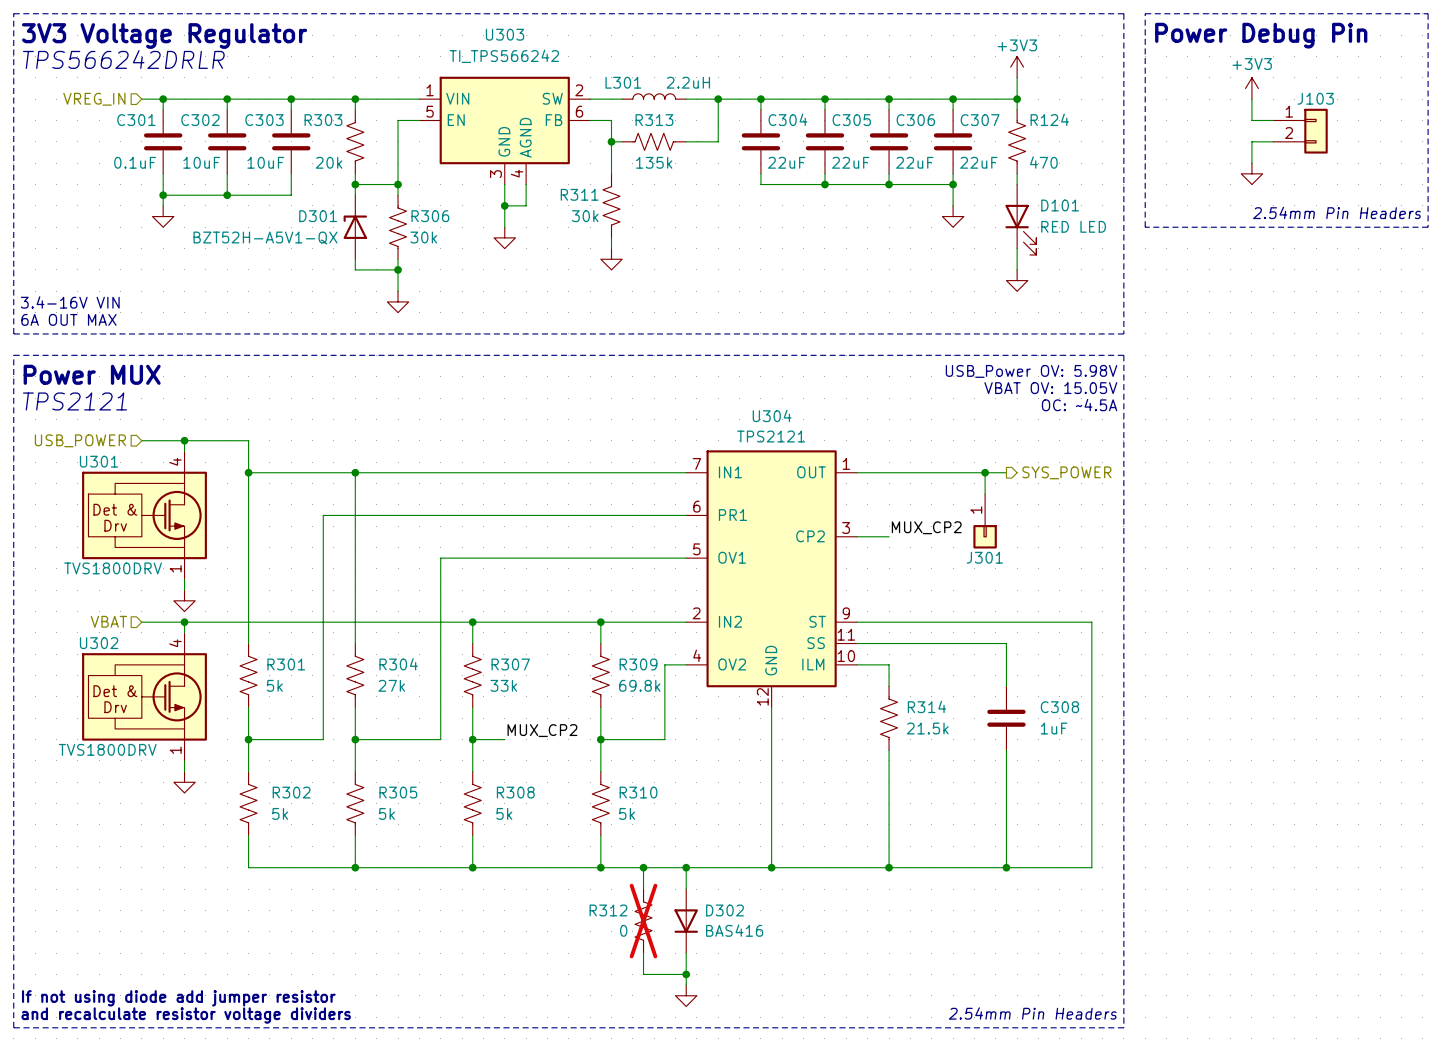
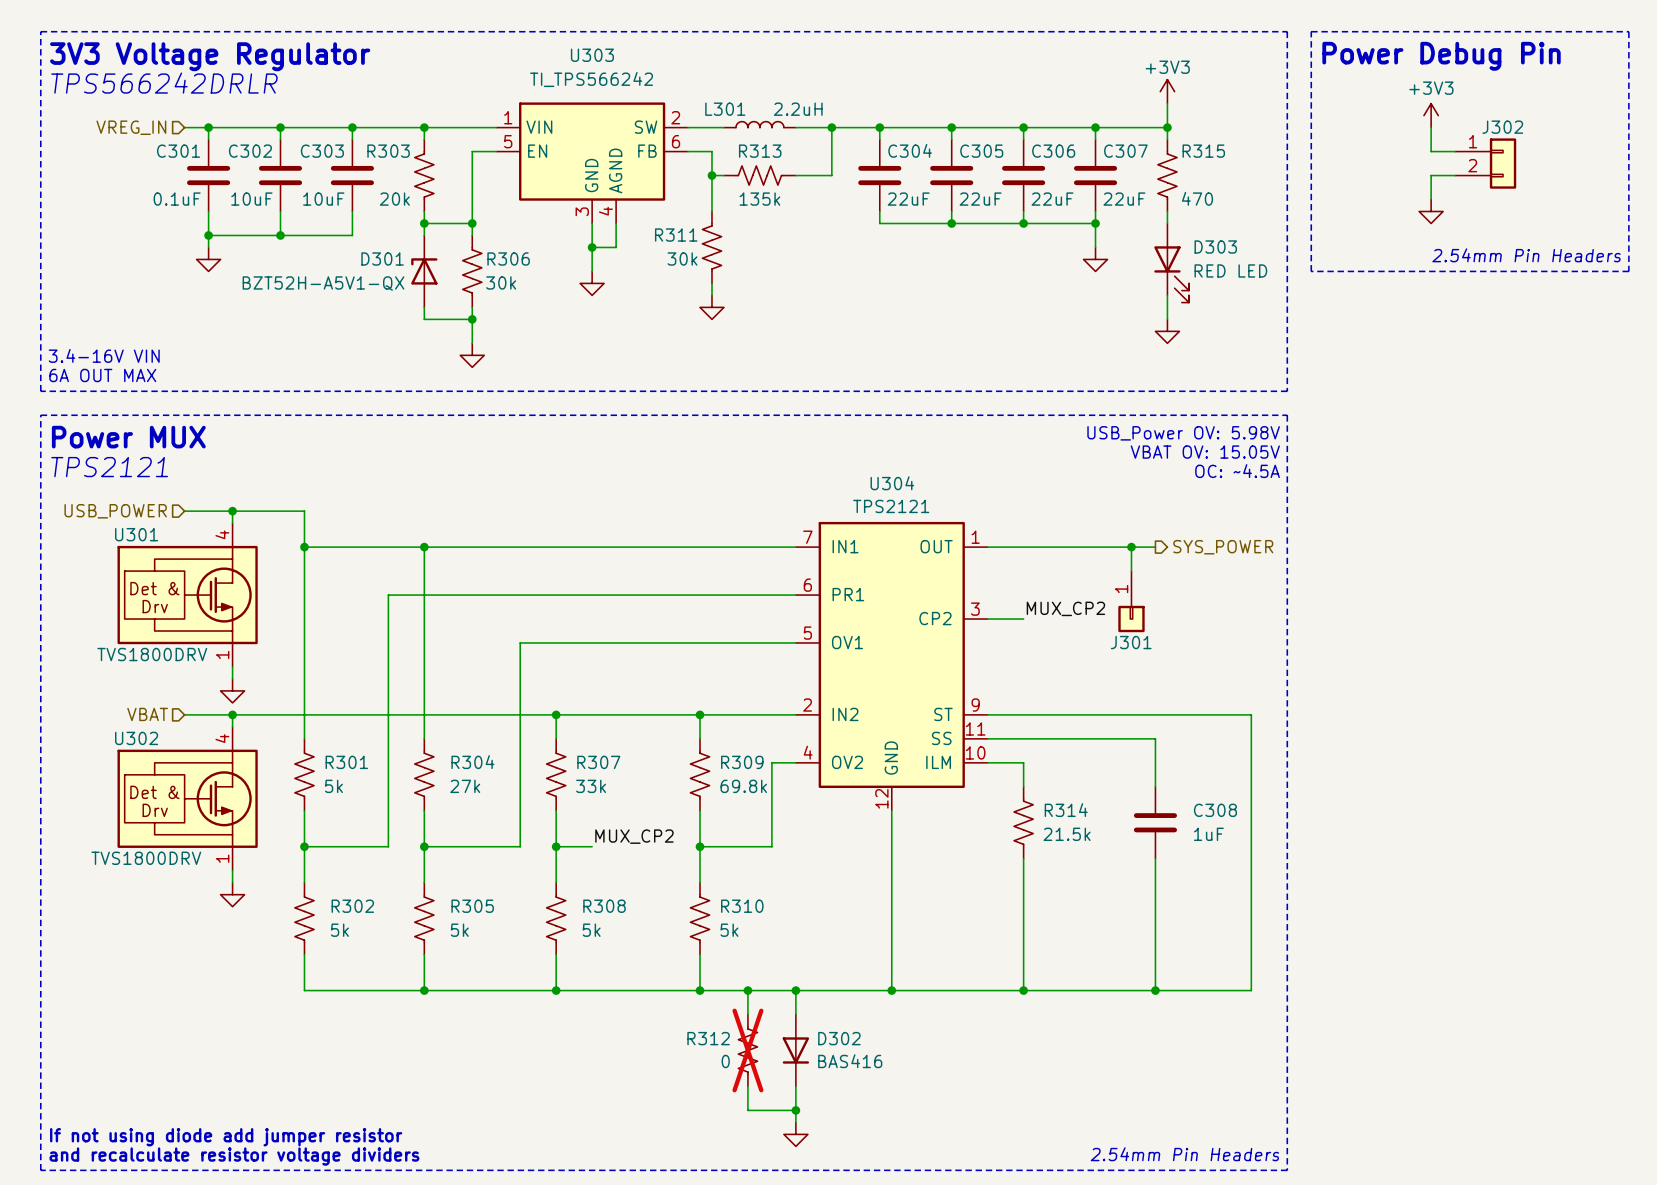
J103 name: J103 (1315, 98) -> J302 (1502, 127)
R124 name: R124 (1049, 119) -> R315 (1203, 151)
D101 name: D101 (1060, 205) -> D303 (1215, 247)

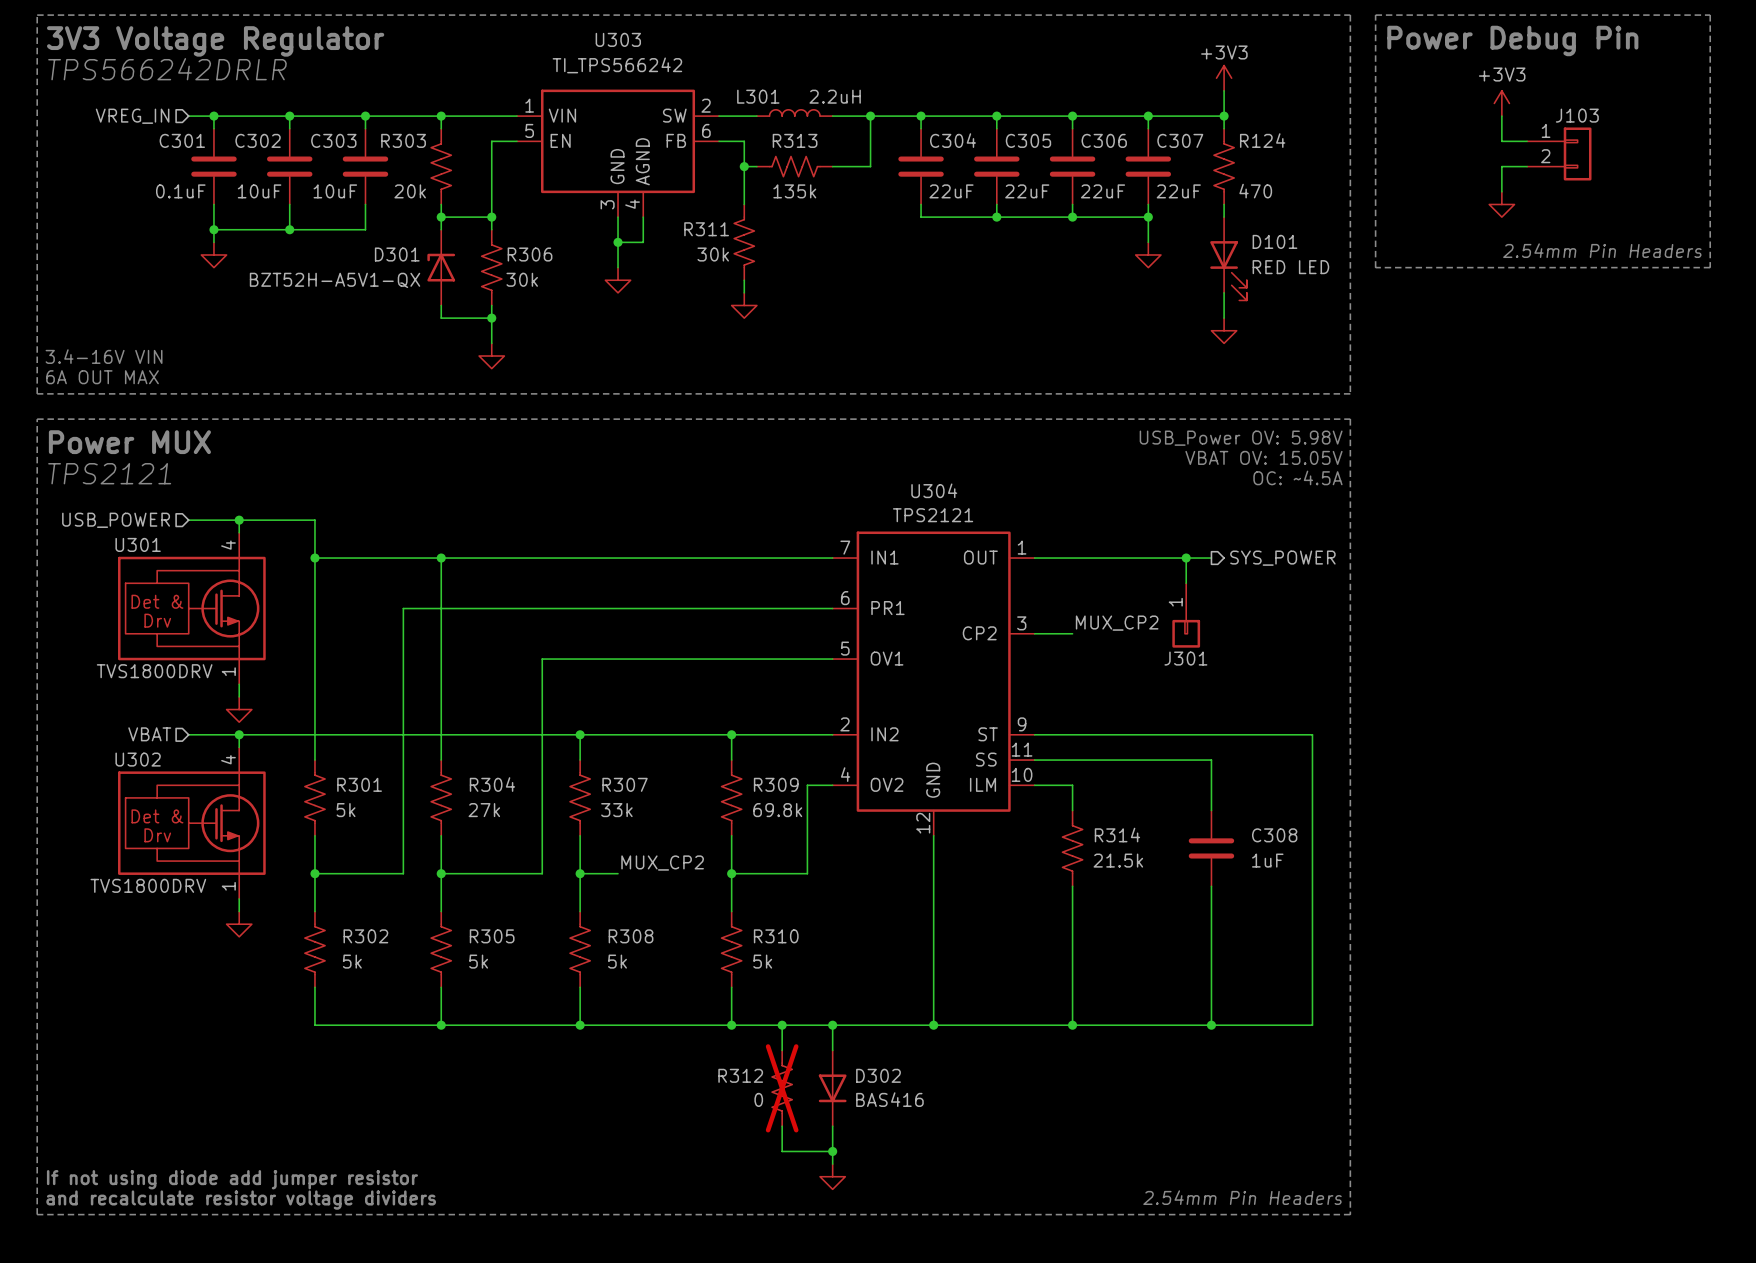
J302 name: J302 (1502, 127) -> J103 (1577, 115)
R315 name: R315 (1203, 151) -> R124 (1262, 140)
D303 name: D303 (1215, 247) -> D101 (1274, 241)

